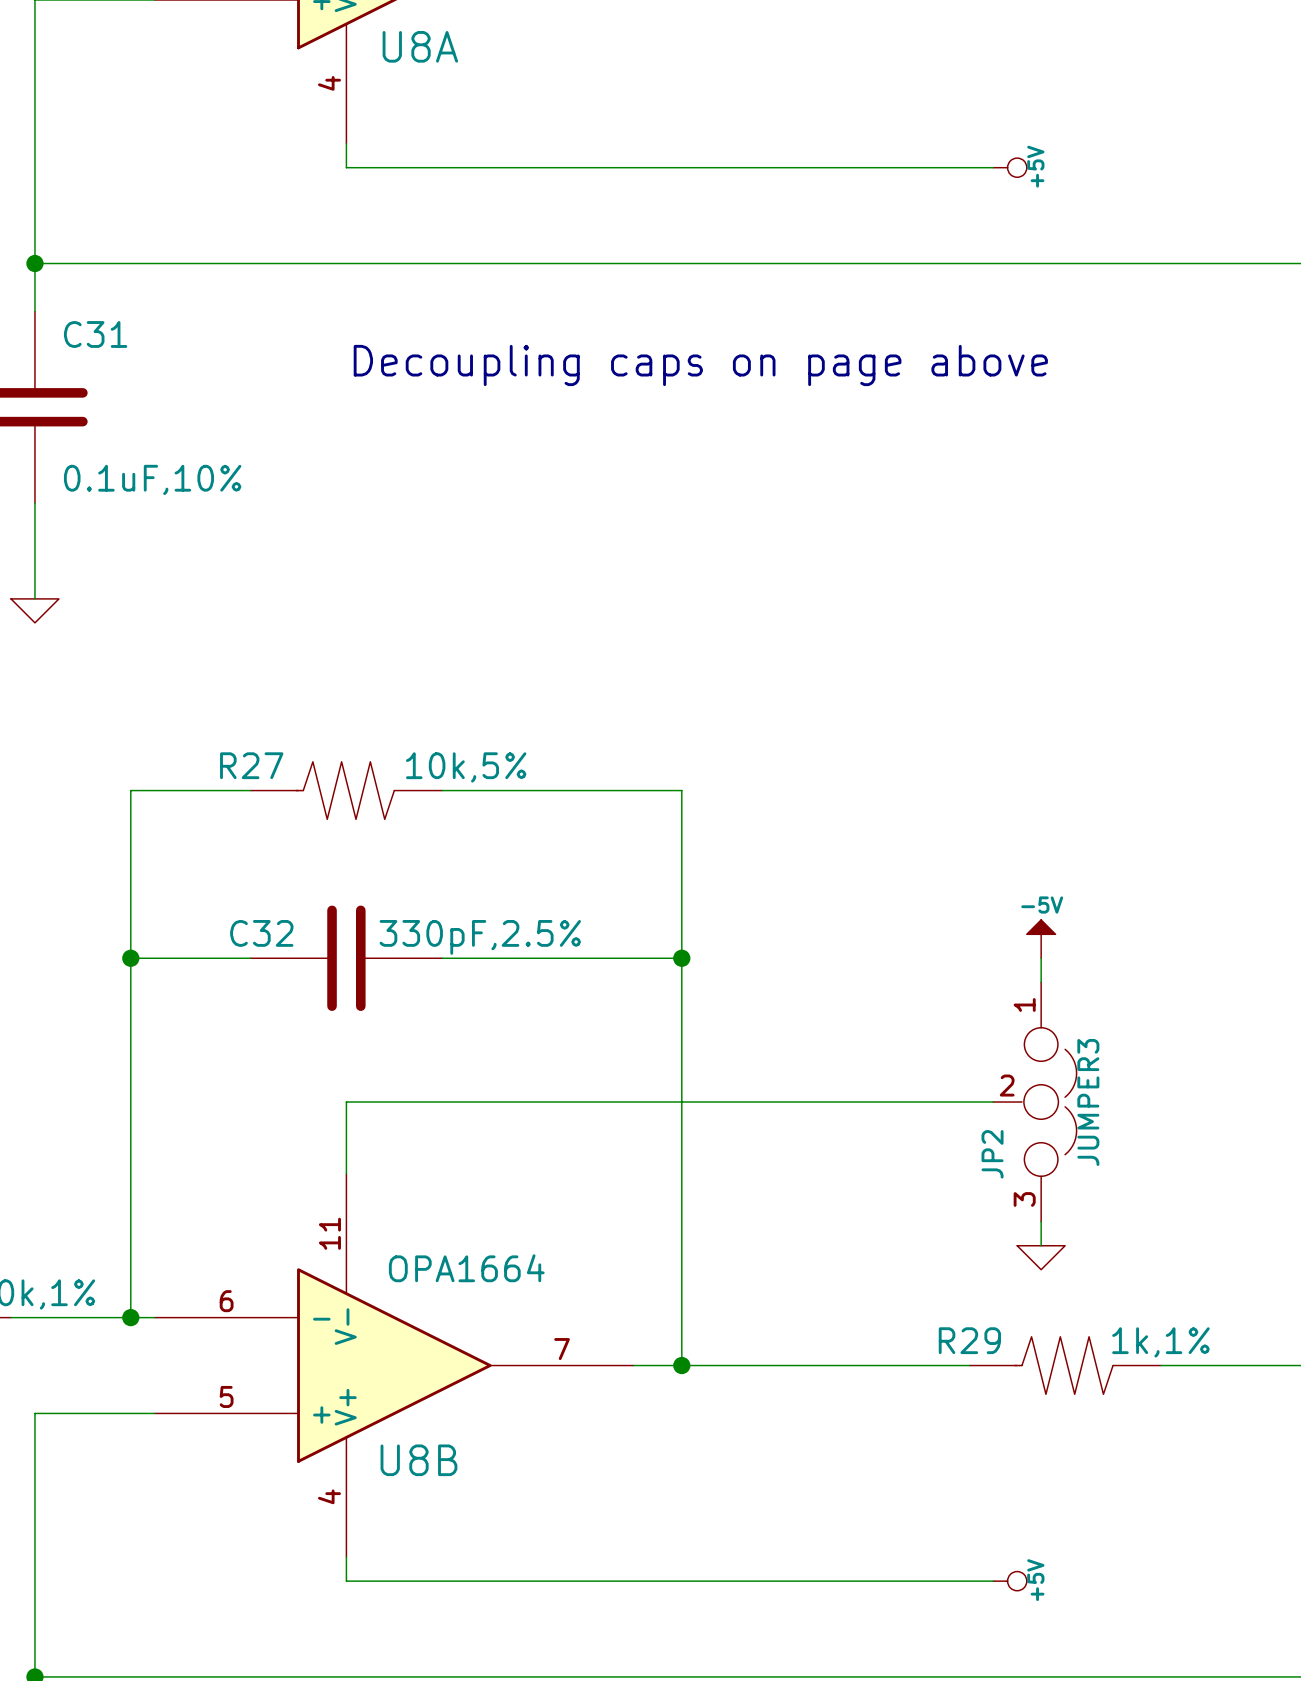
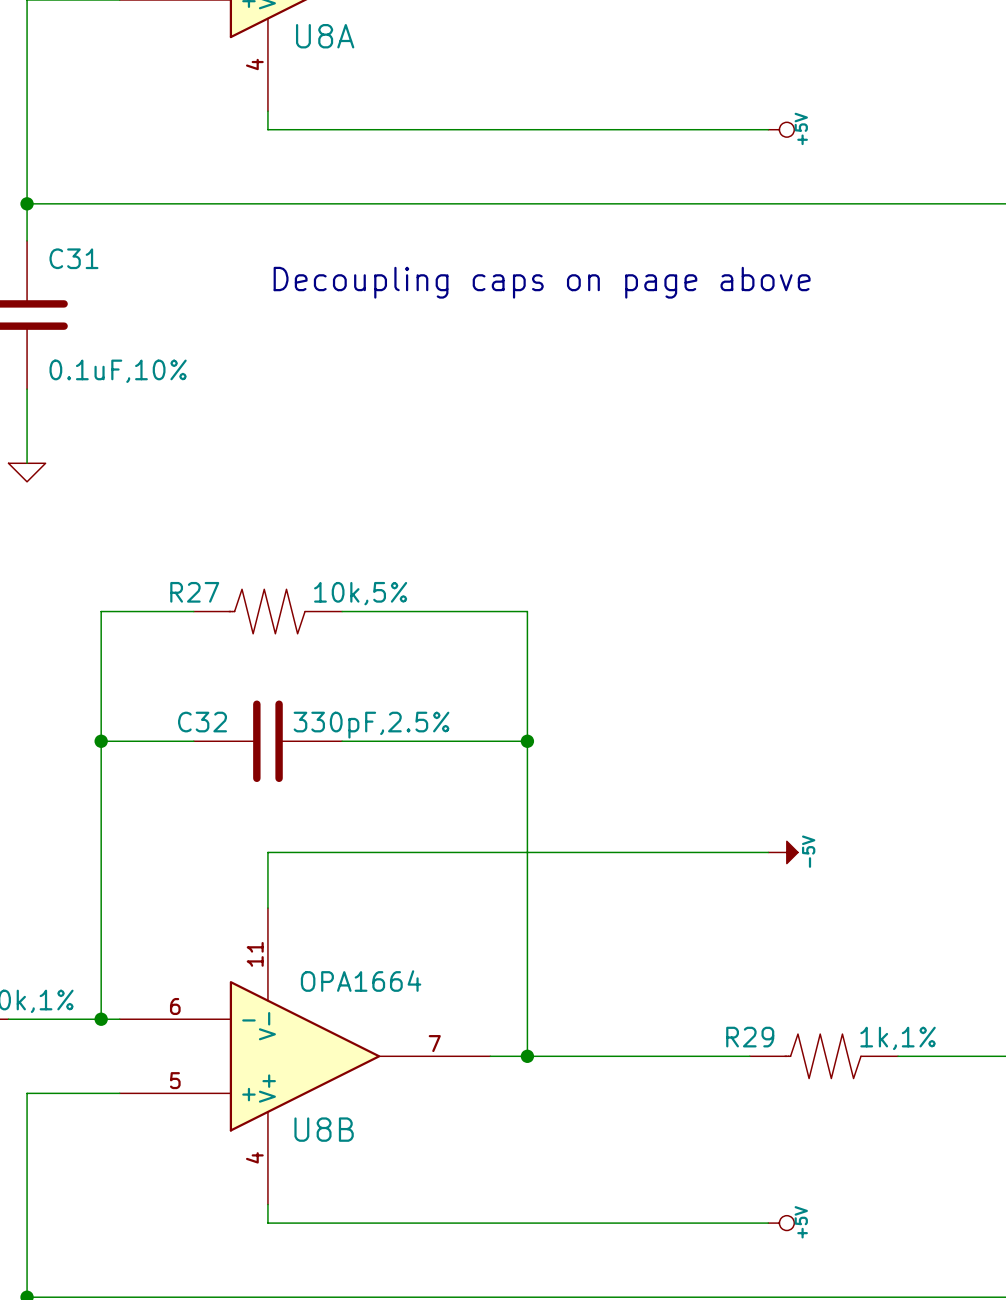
power symbol rotation: 0° (1041, 939) -> 90° clockwise (783, 852)
power symbol position: -5V (1041, 939) -> -5V (783, 852)
wire: (1041, 958) (1041, 982) -> none
JP2: JUMPER3 (1034, 1102) -> none
wire: (1041, 1221) (1041, 1245) -> none
power symbol: (1041, 1257) -> none

